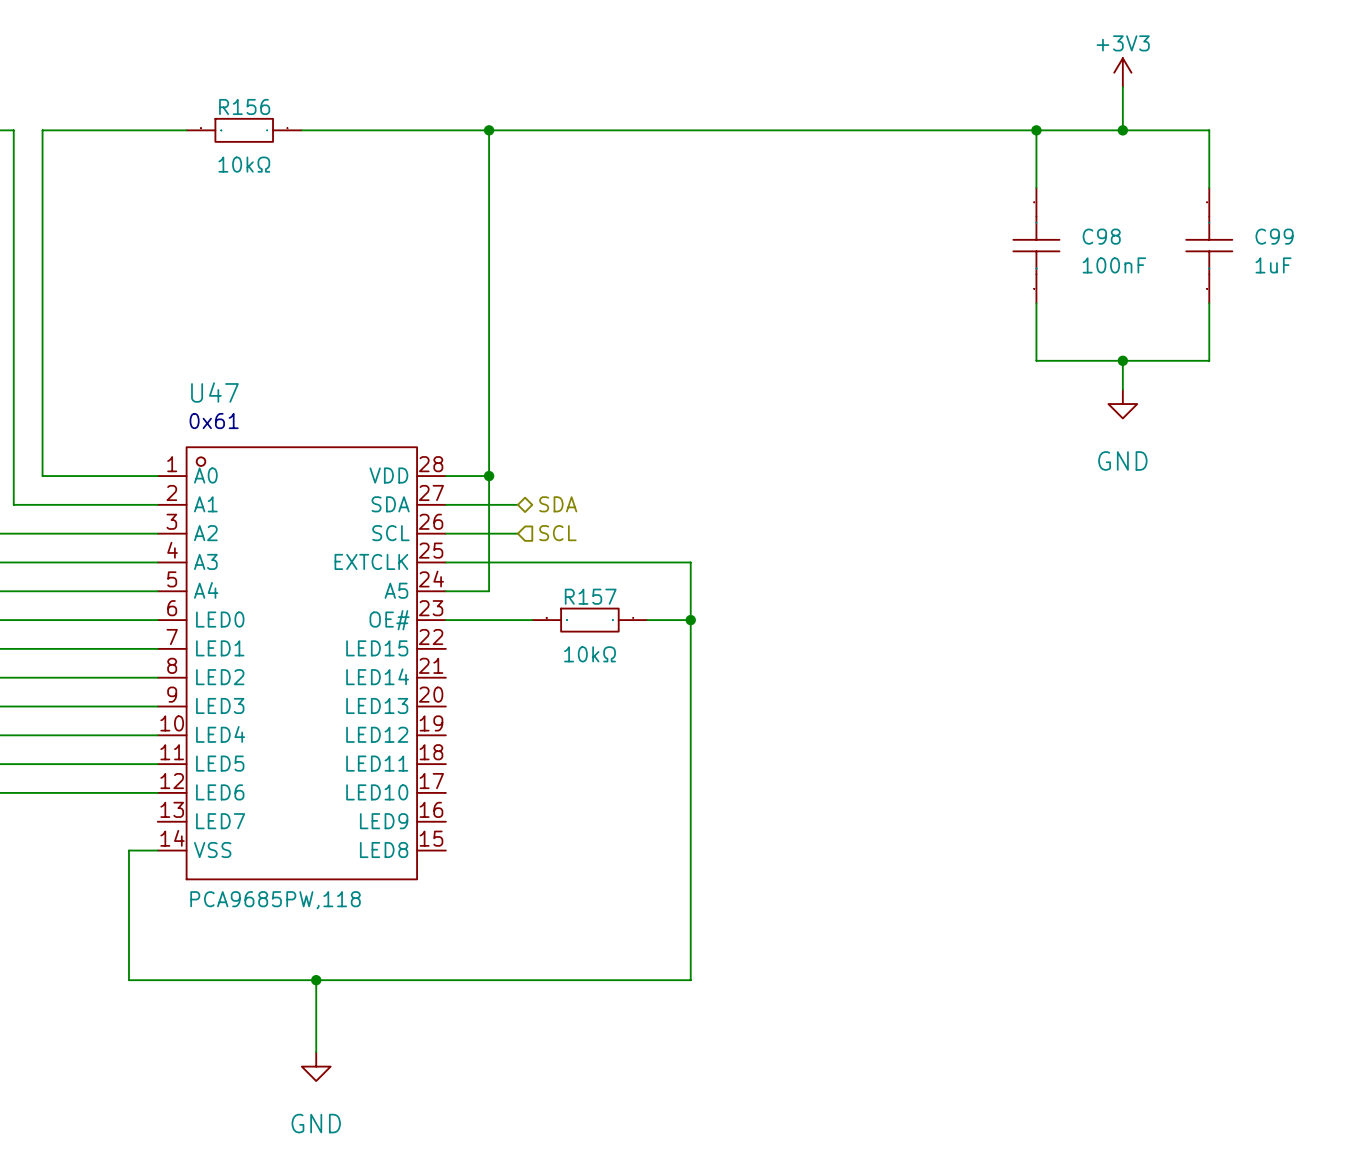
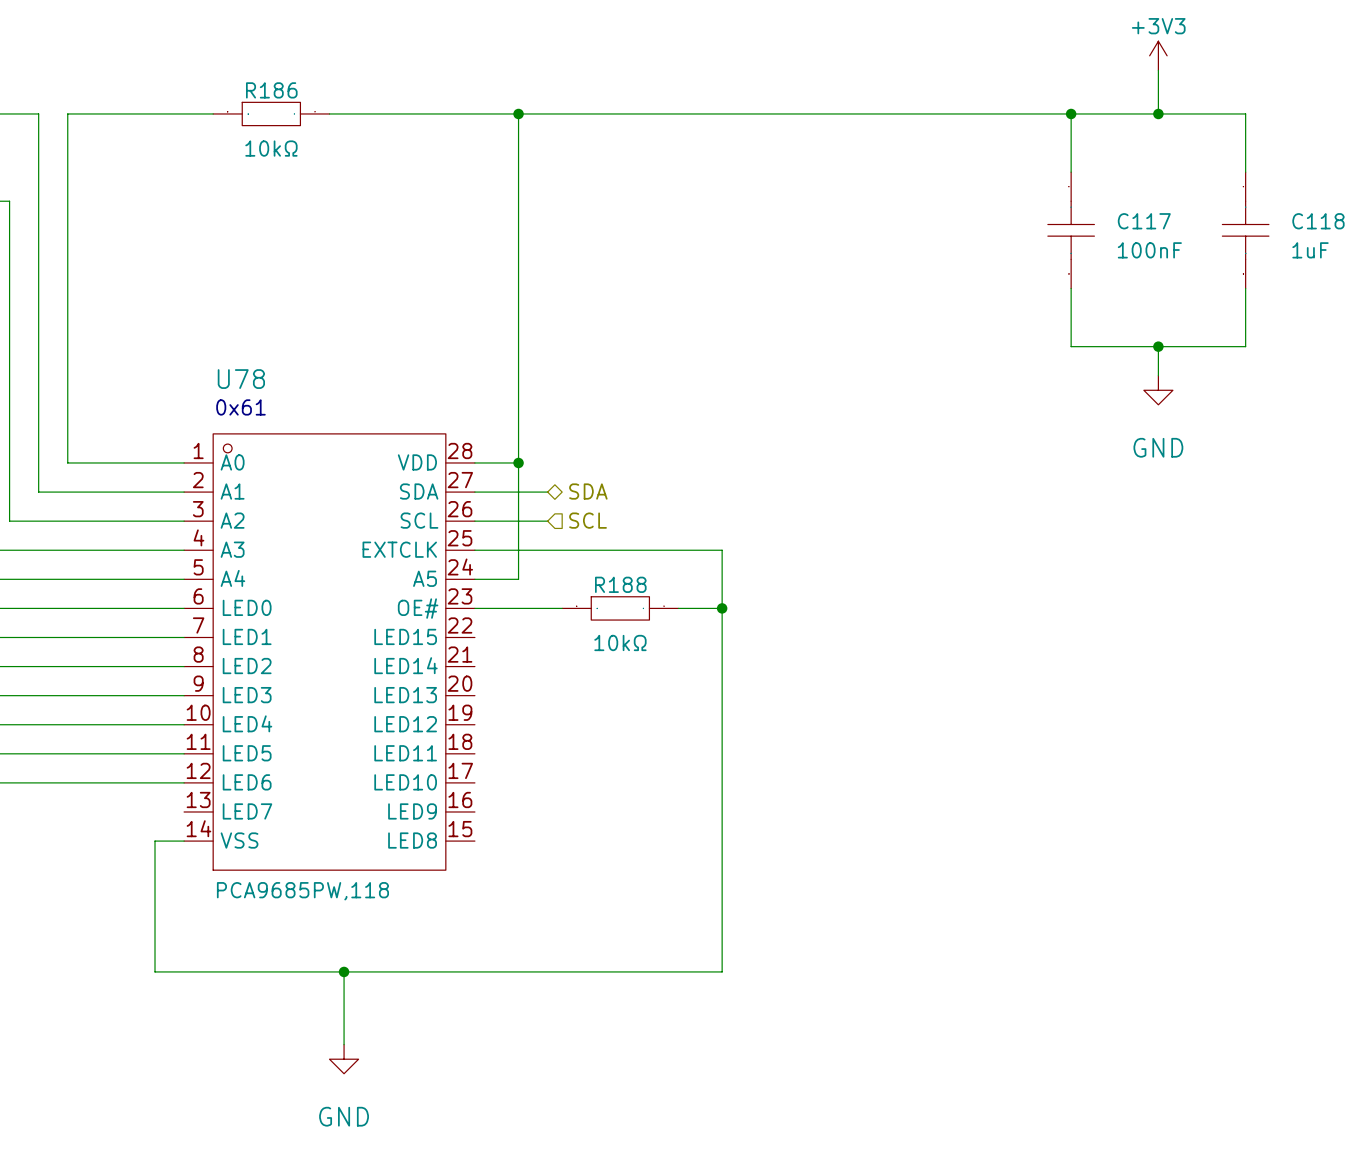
R156 name: R156 (244, 106) -> R186 (271, 90)
C98 name: C98 (1101, 236) -> C117 (1144, 221)
C99 name: C99 (1274, 236) -> C118 (1318, 221)
U47 name: U47 (214, 392) -> U78 (241, 379)
R157 name: R157 (590, 596) -> R188 (620, 584)

